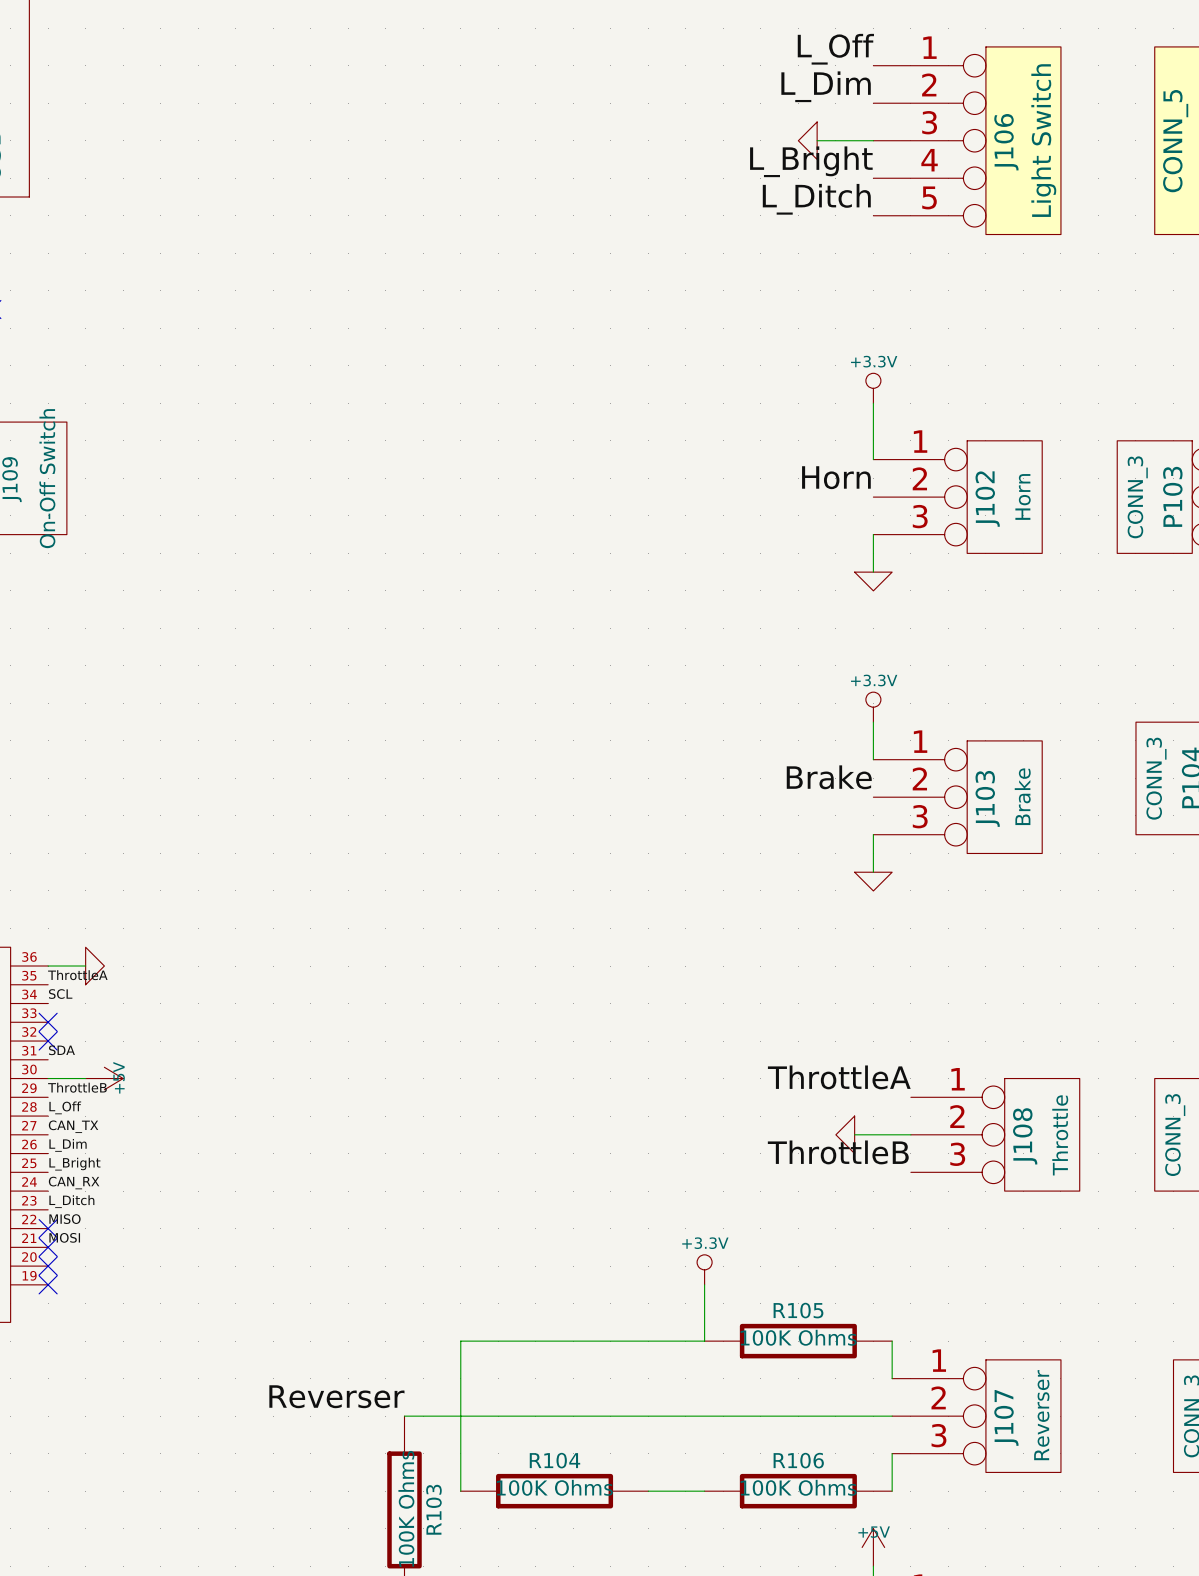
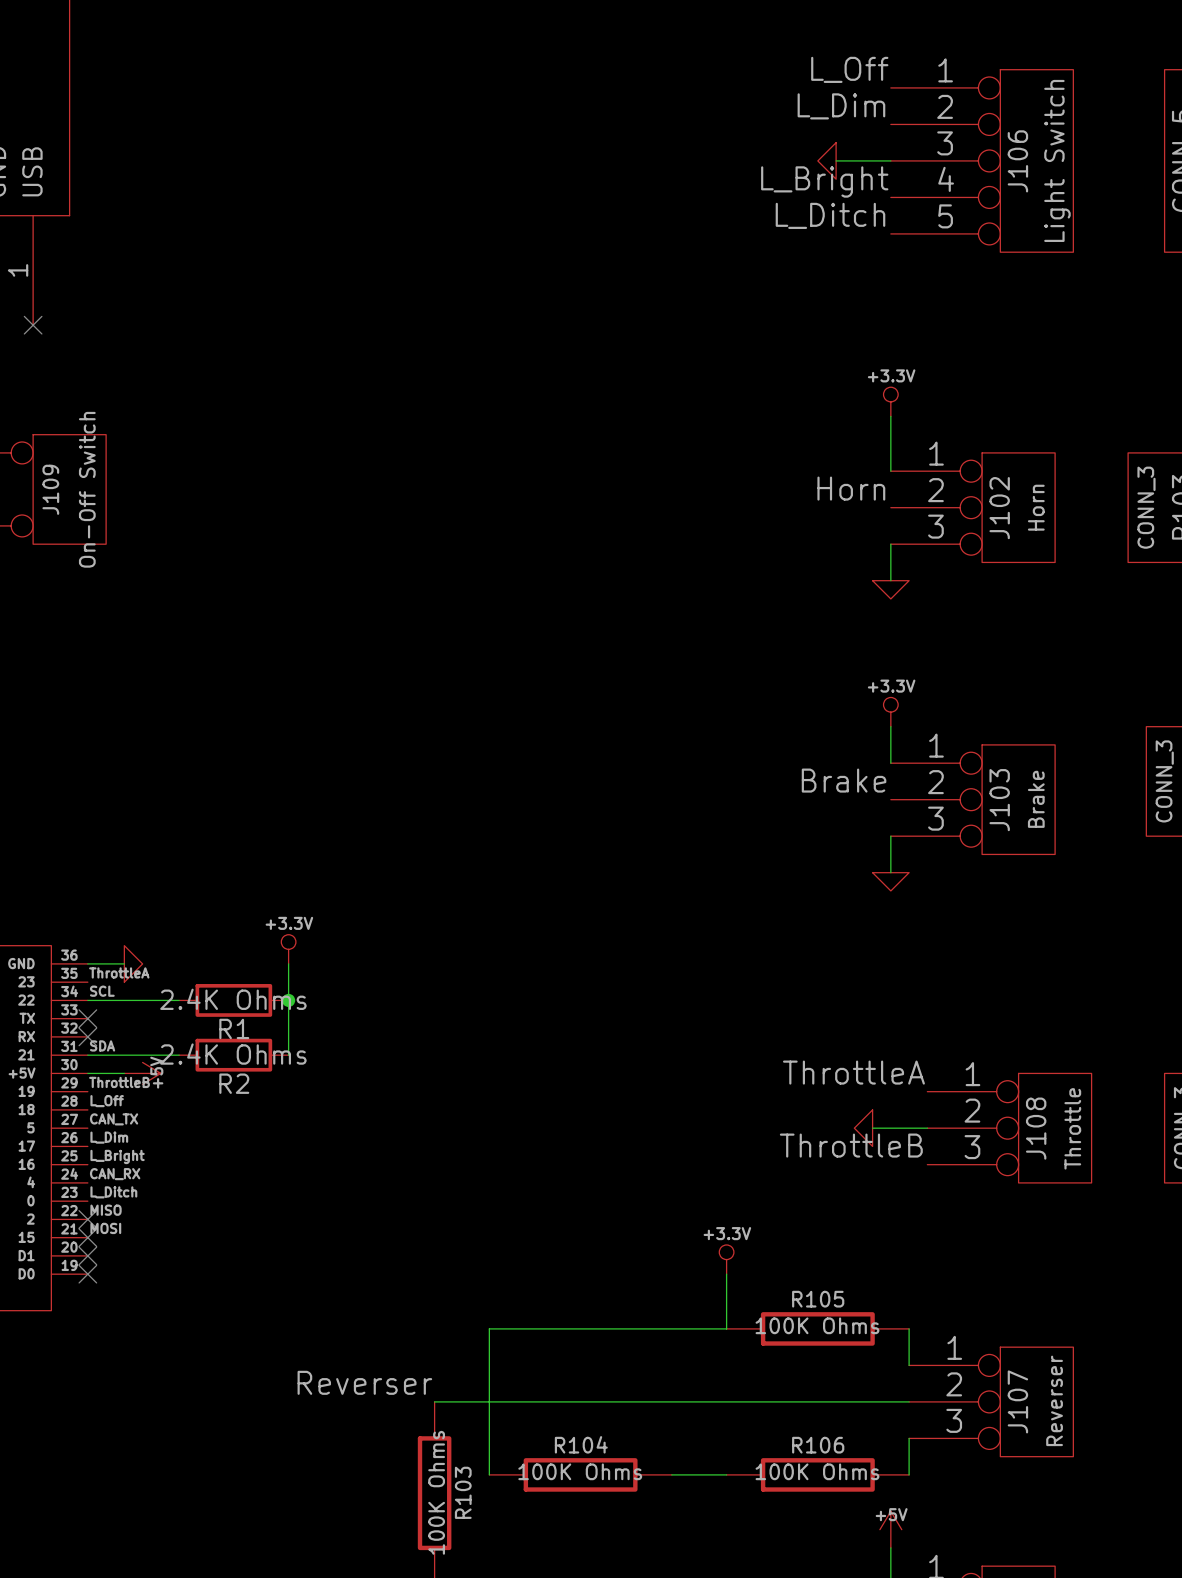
power symbol: none -> +3.3V (288, 949)
wire: none -> (288, 963) (288, 1055)
wire: none -> (87, 1000) (179, 1000)
R1: none -> 2.4K Ohms (233, 1000)
junction: none -> (288, 1000)
wire: none -> (87, 1055) (179, 1055)
R2: none -> 2.4K Ohms (233, 1055)

